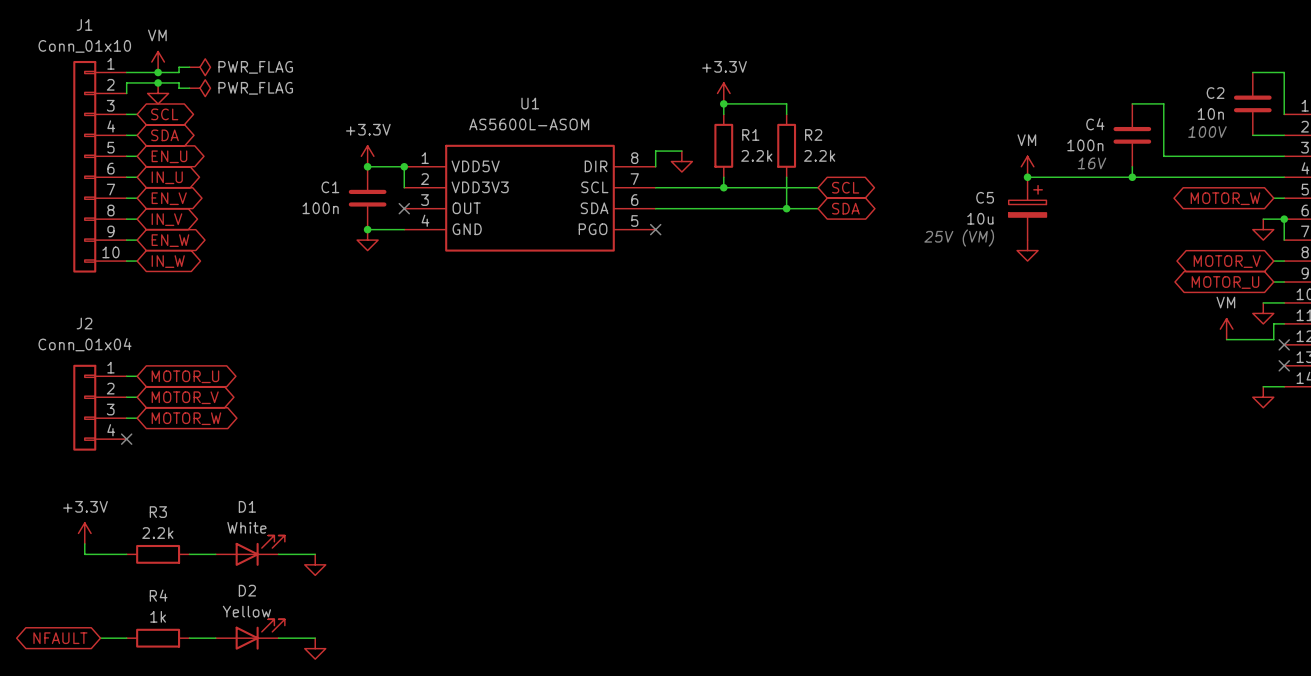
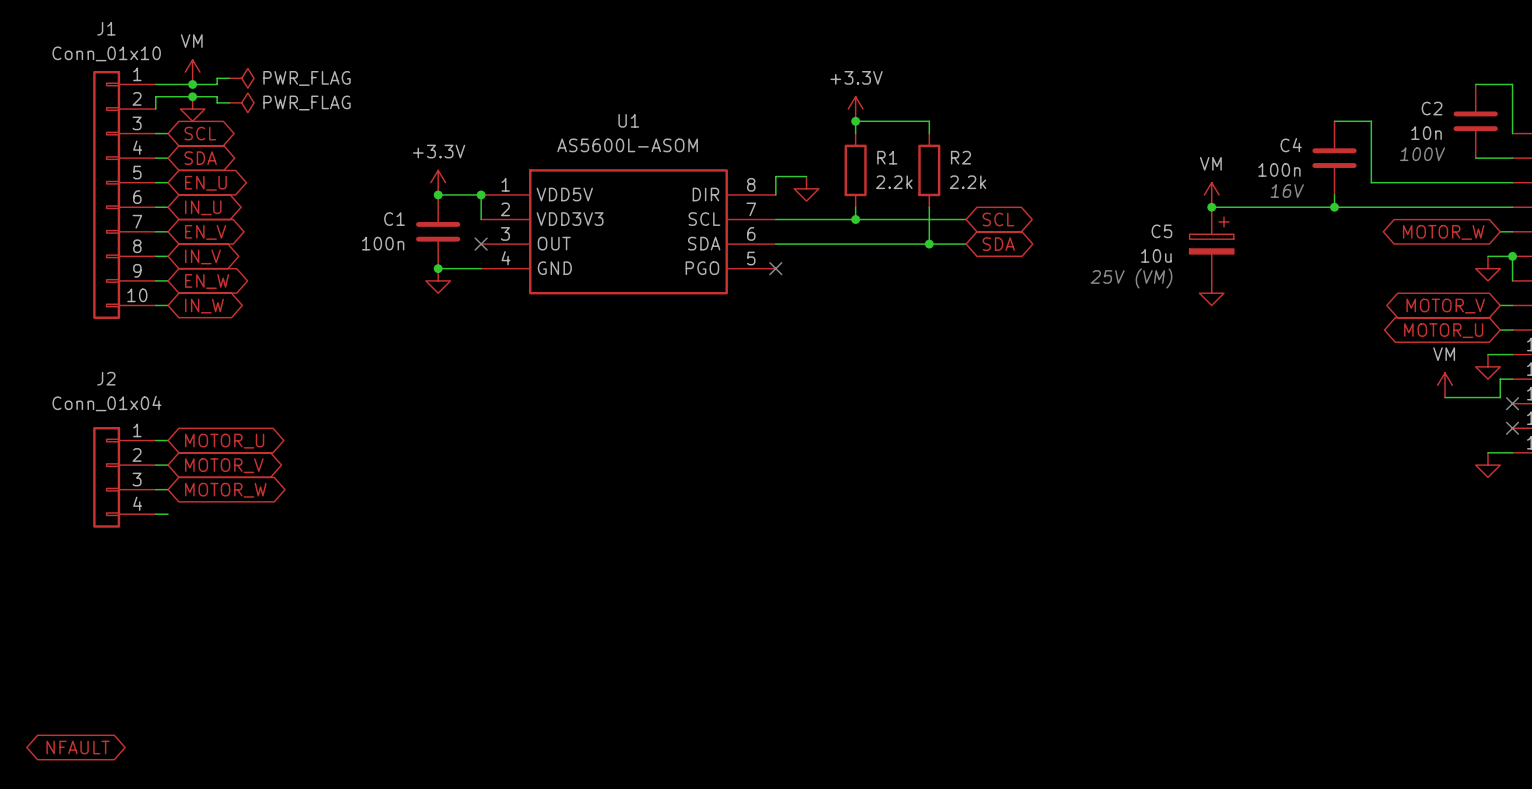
wire: none -> (155, 514) (168, 514)
no-connect mark: (126, 439) -> none
power symbol: +3.3V (84, 533) -> none
wire: (84, 543) (84, 554) (126, 554) -> none
D1: White (250, 550) -> none
R3: 2.2k (158, 554) -> none
wire: (189, 554) (215, 554) -> none
wire: (278, 554) (315, 554) -> none
power symbol: (315, 564) -> none
D2: Yellow (250, 634) -> none
wire: (100, 638) (126, 638) -> none
R4: 1k (158, 638) -> none
wire: (189, 638) (215, 638) -> none
wire: (278, 638) (315, 638) -> none
power symbol: (315, 648) -> none

